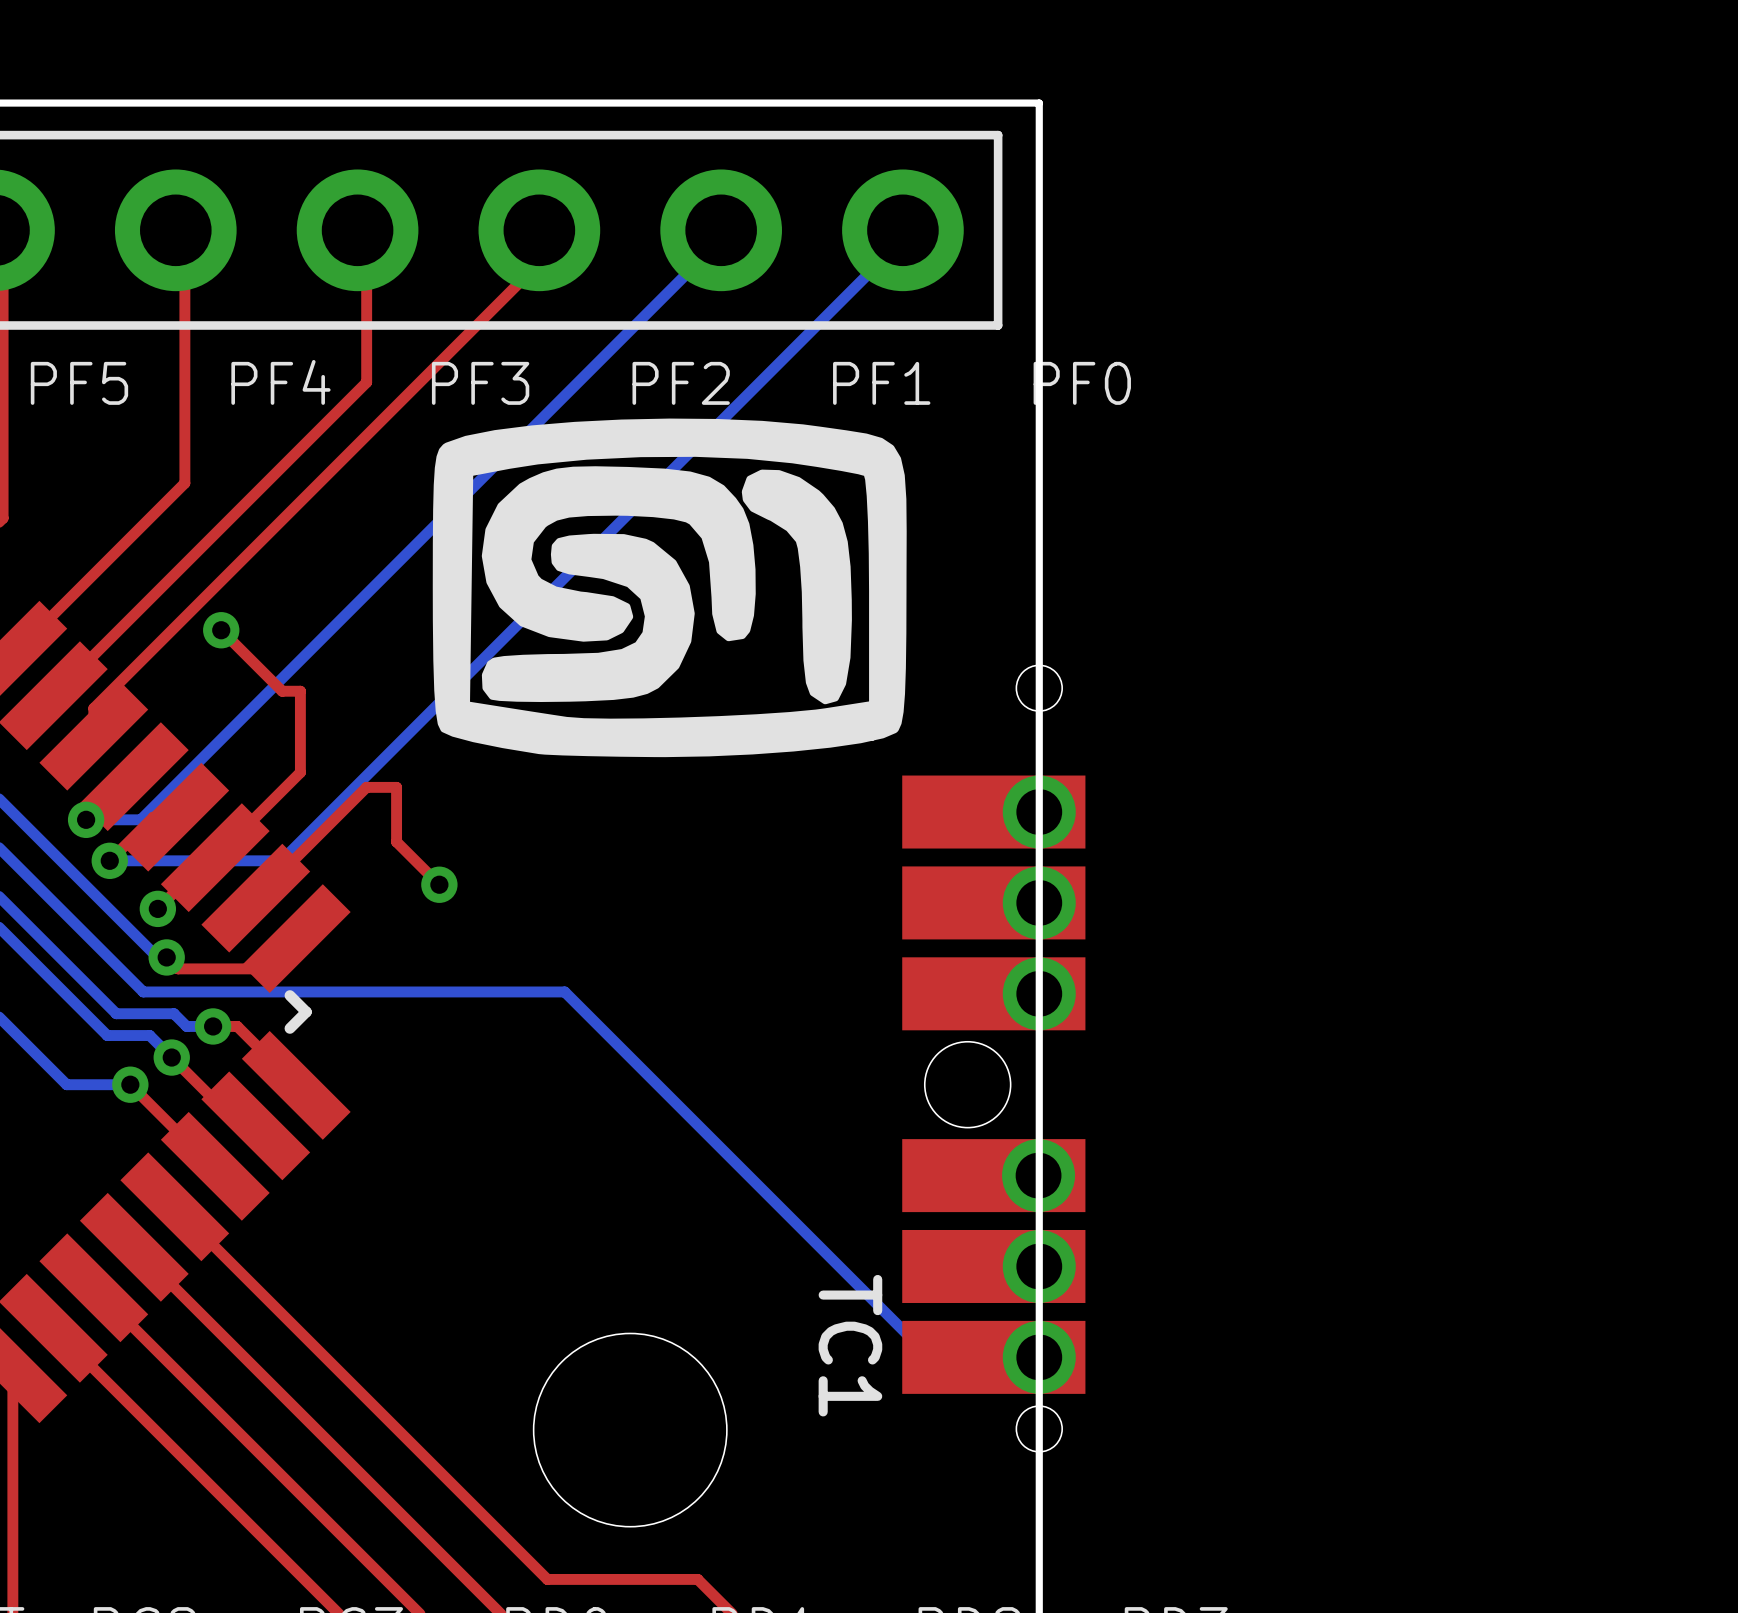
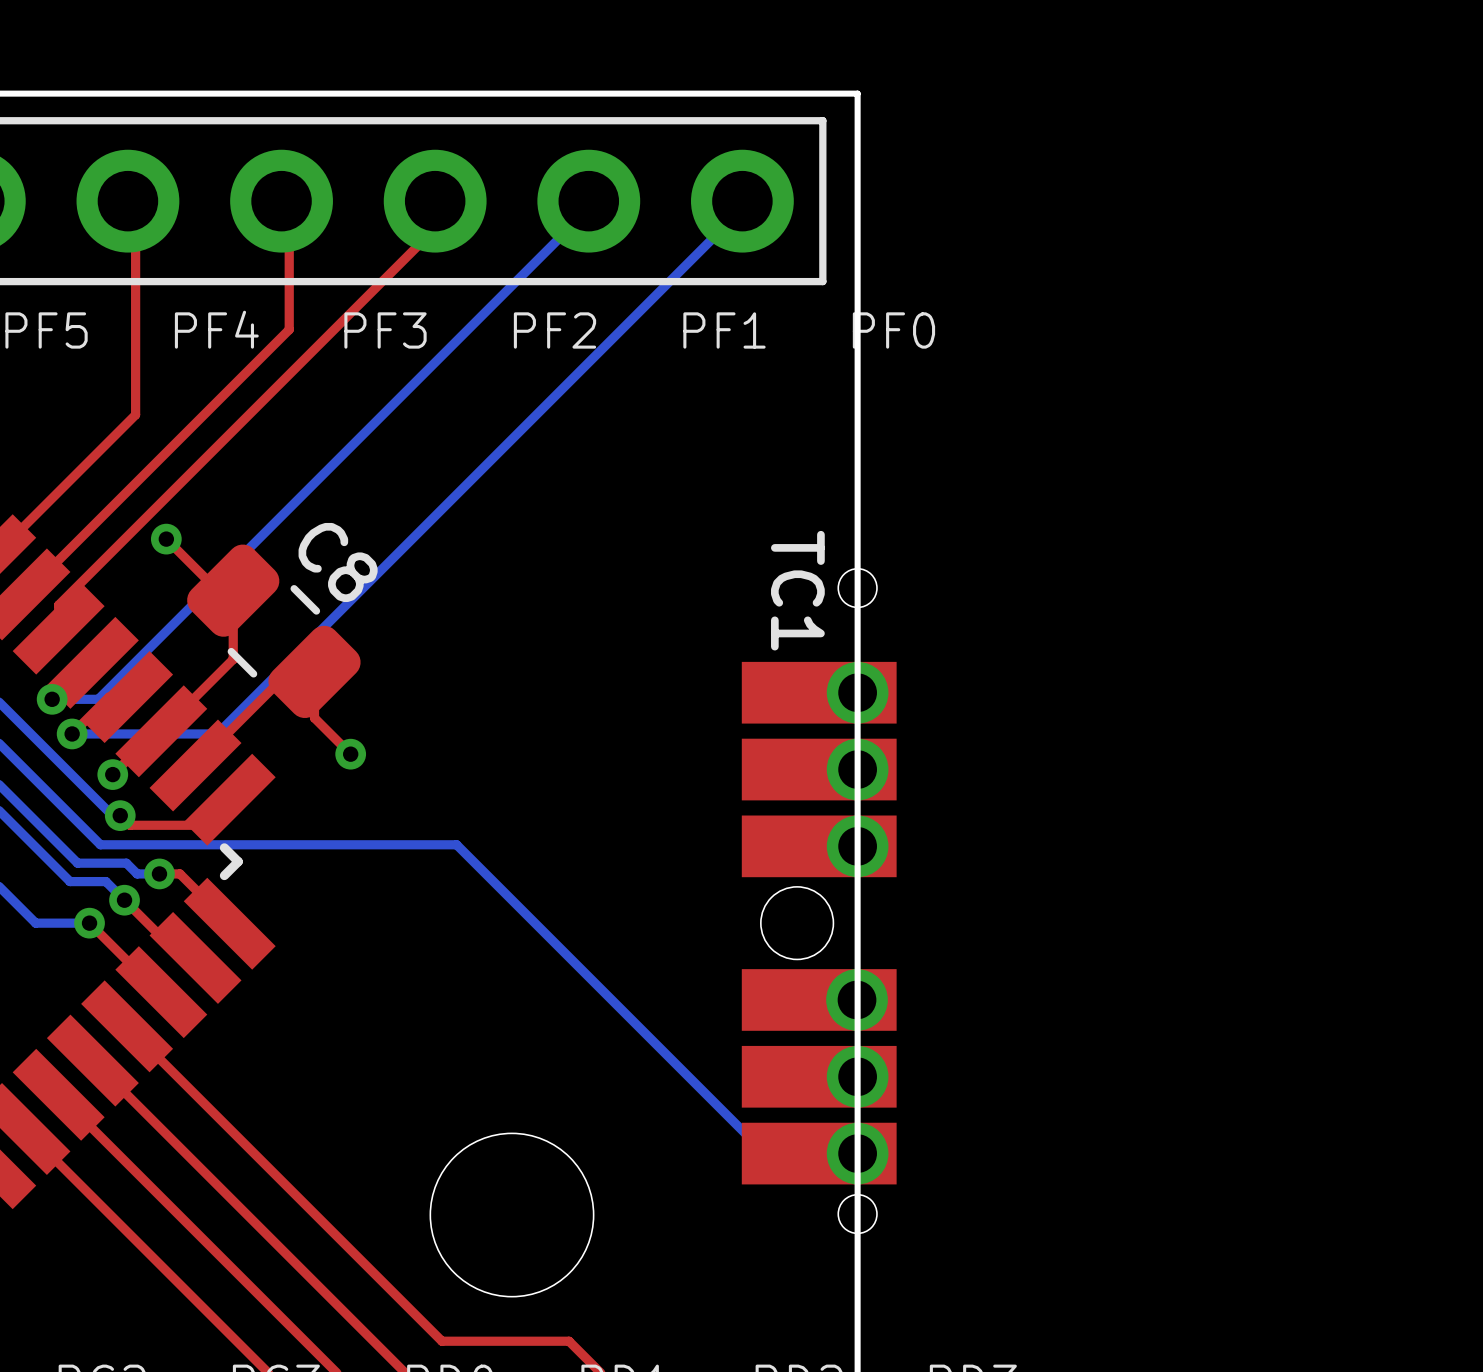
drawing: [432, 418, 907, 758] -> none
C8: none -> (273, 631)
TC1 name position: TC1 (850, 1345) -> TC1 (797, 590)

